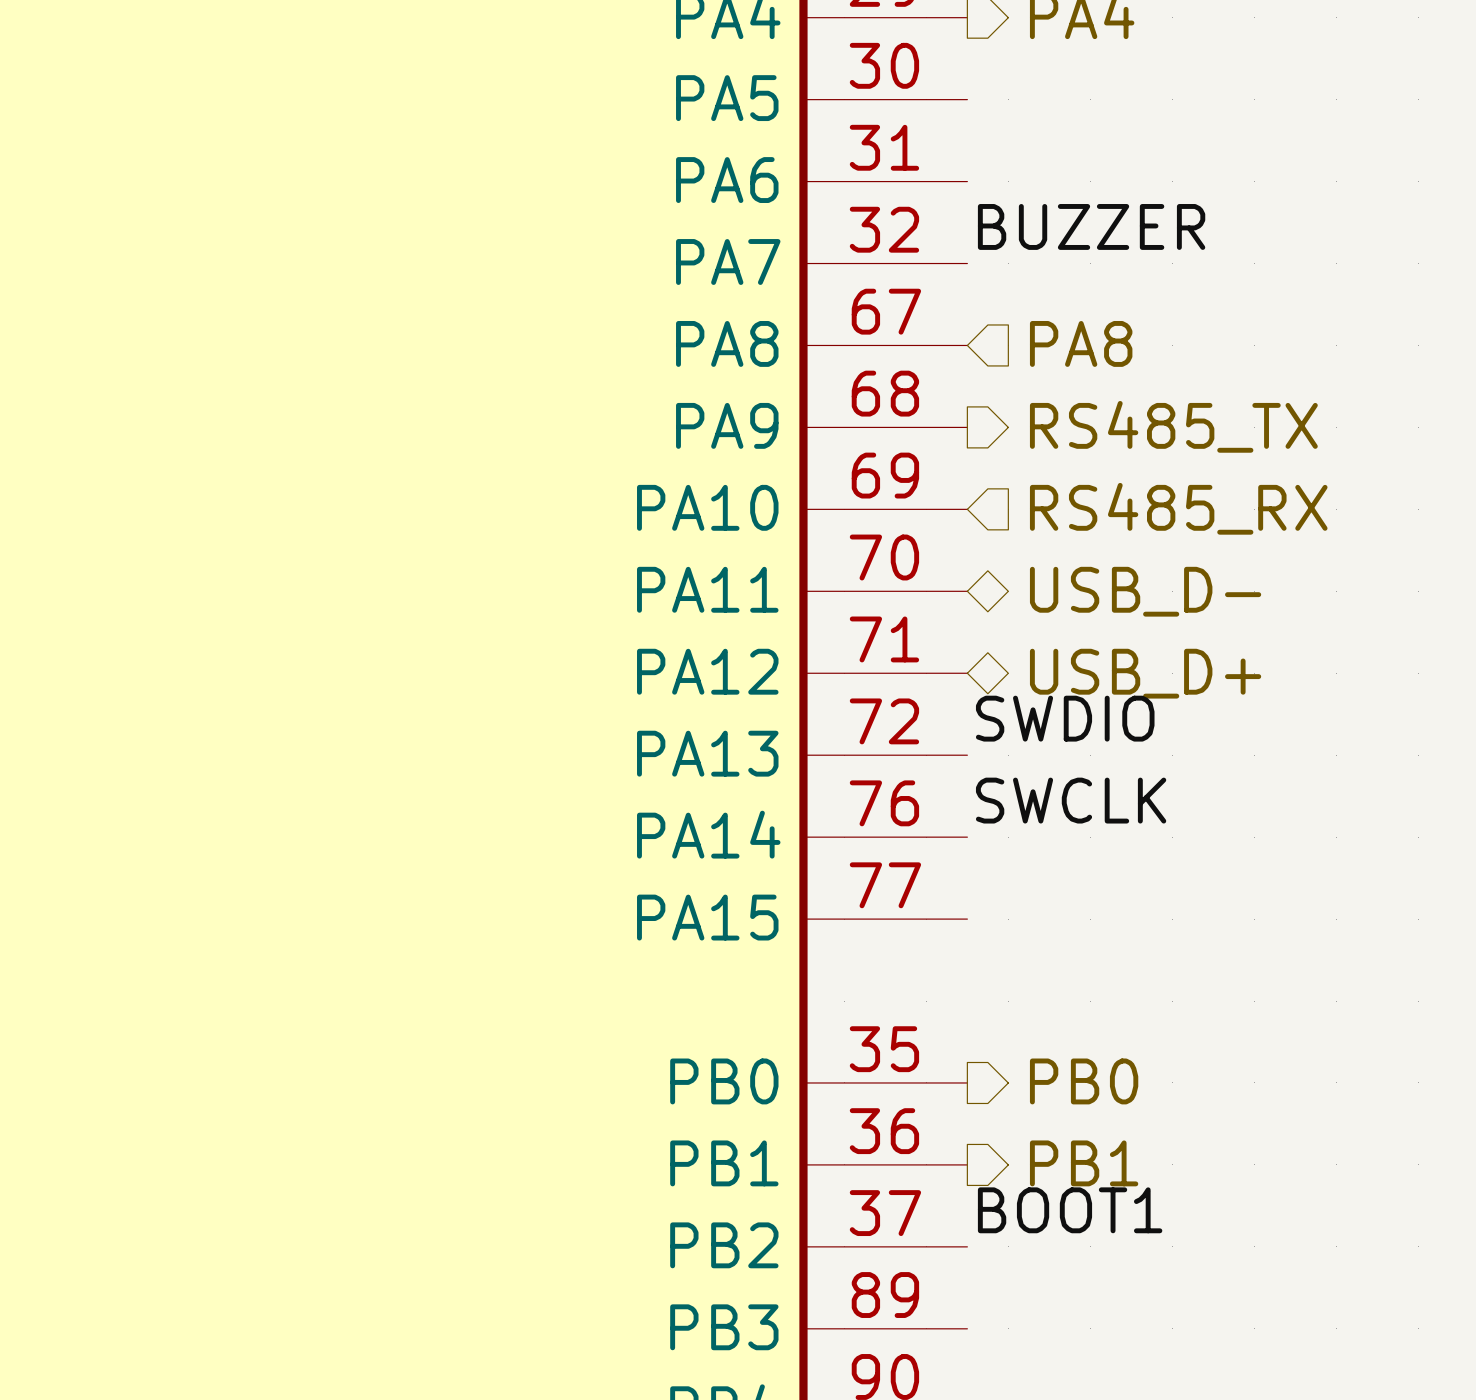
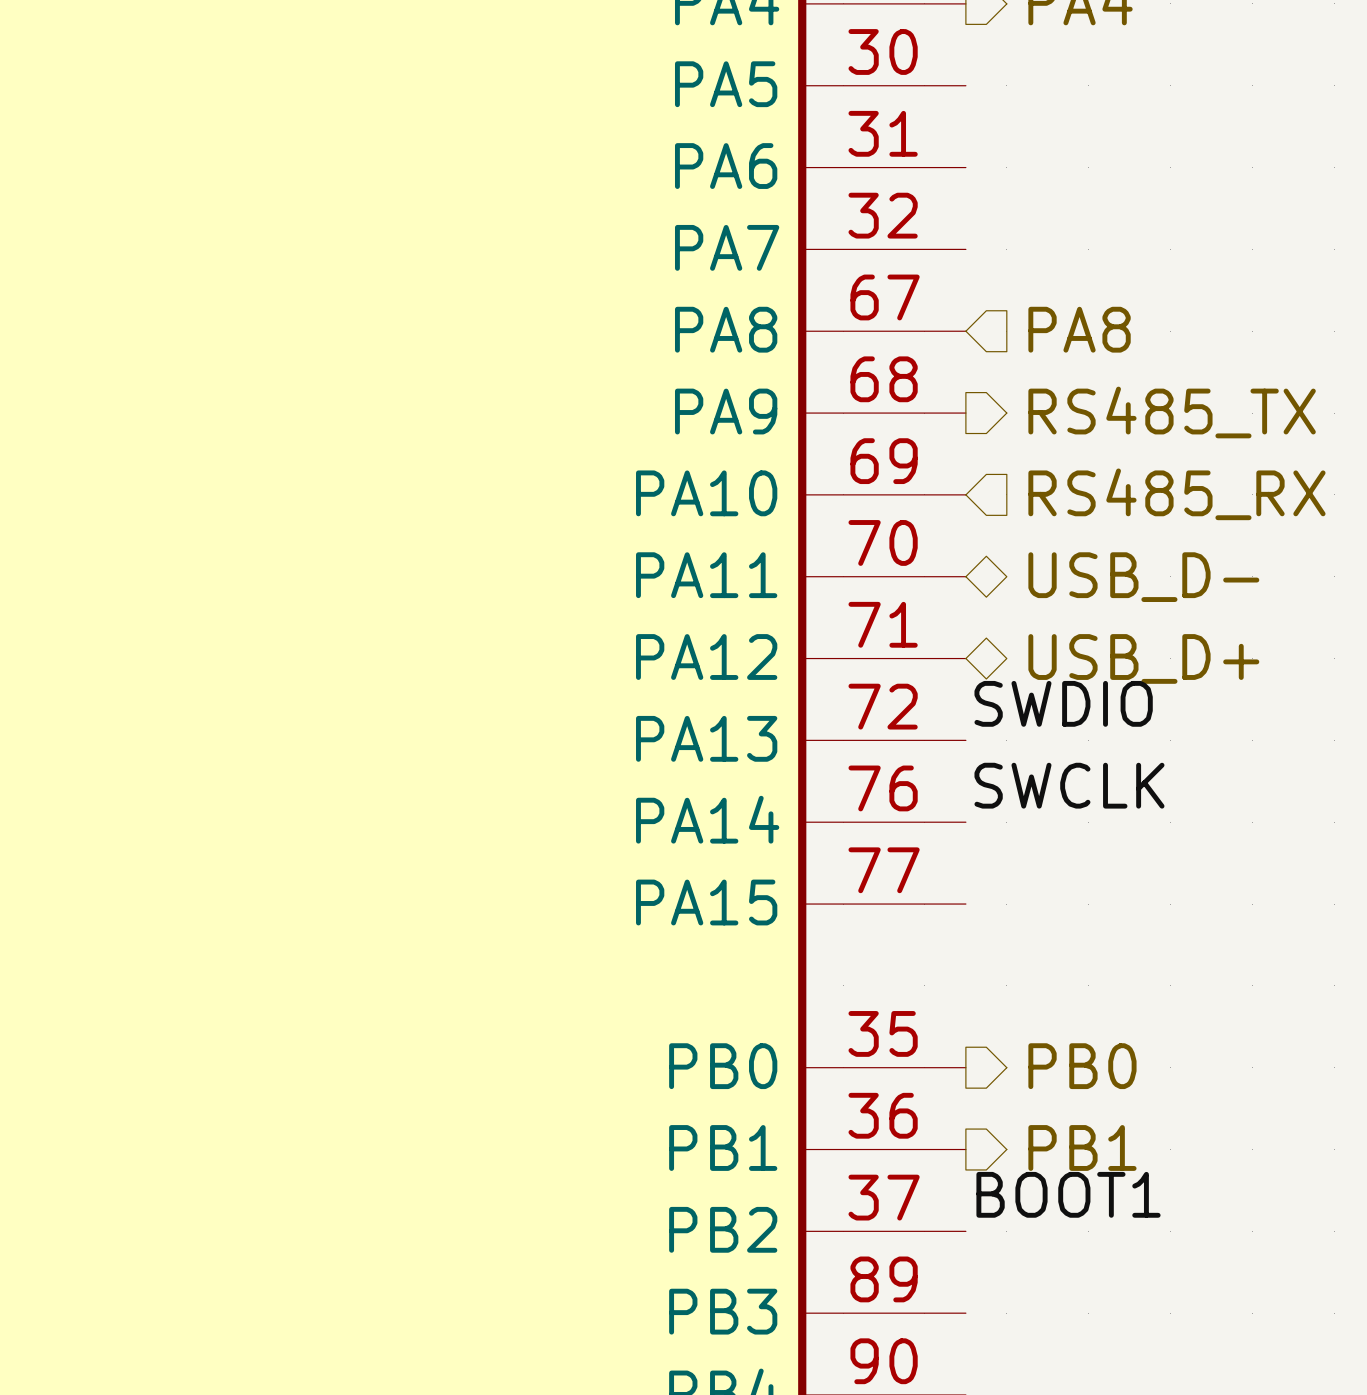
label: BUZZER (1091, 226) -> none

